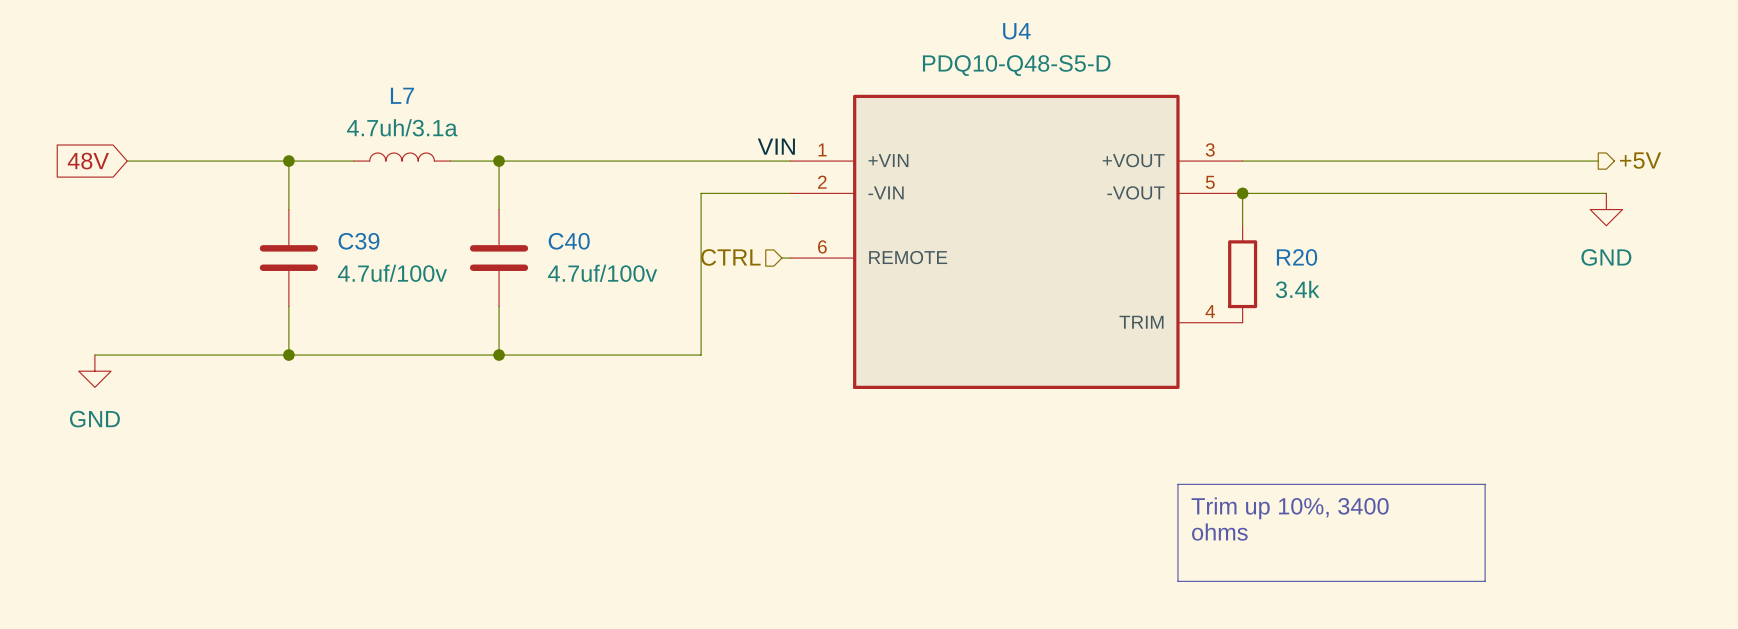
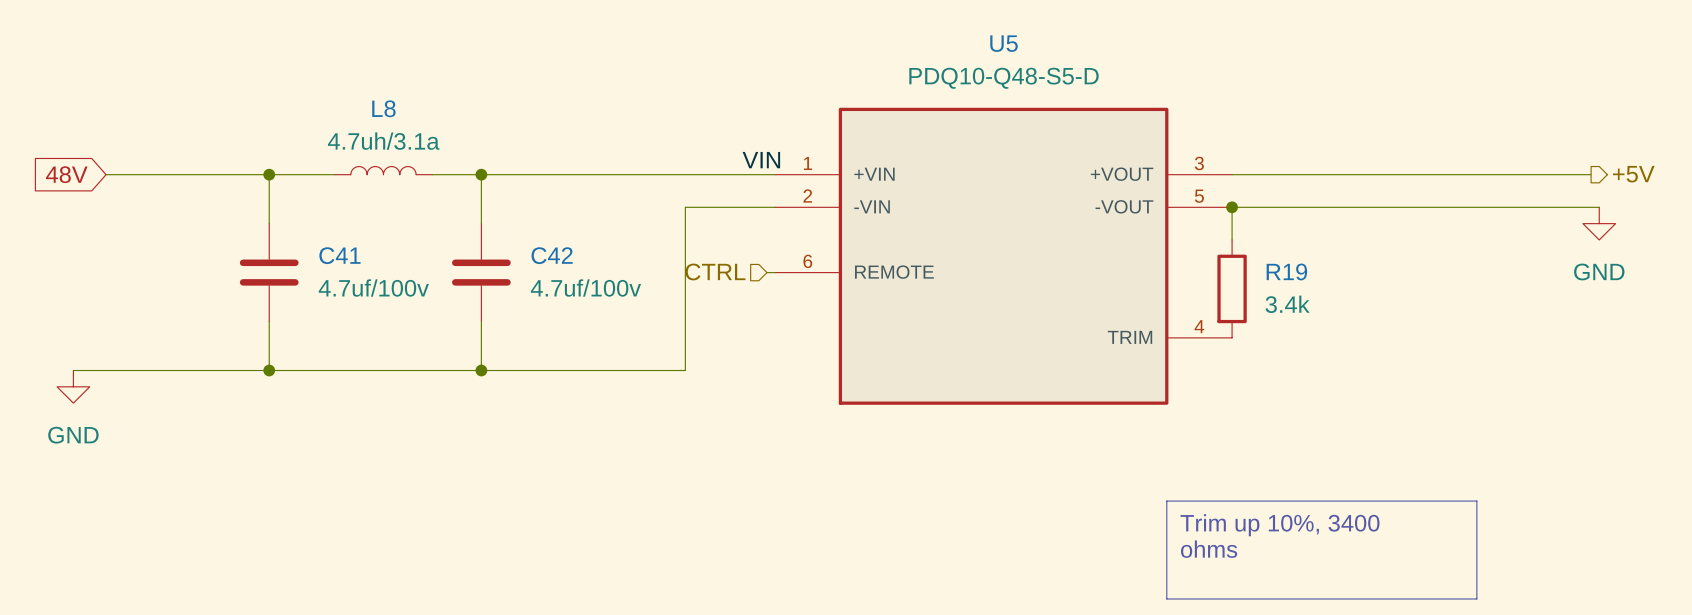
U4 name: U4 (1016, 31) -> U5 (1004, 43)
L7 name: L7 (402, 95) -> L8 (383, 108)
C39 name: C39 (358, 241) -> C41 (339, 255)
C40 name: C40 (569, 241) -> C42 (552, 255)
R20 name: R20 (1297, 257) -> R19 (1286, 271)

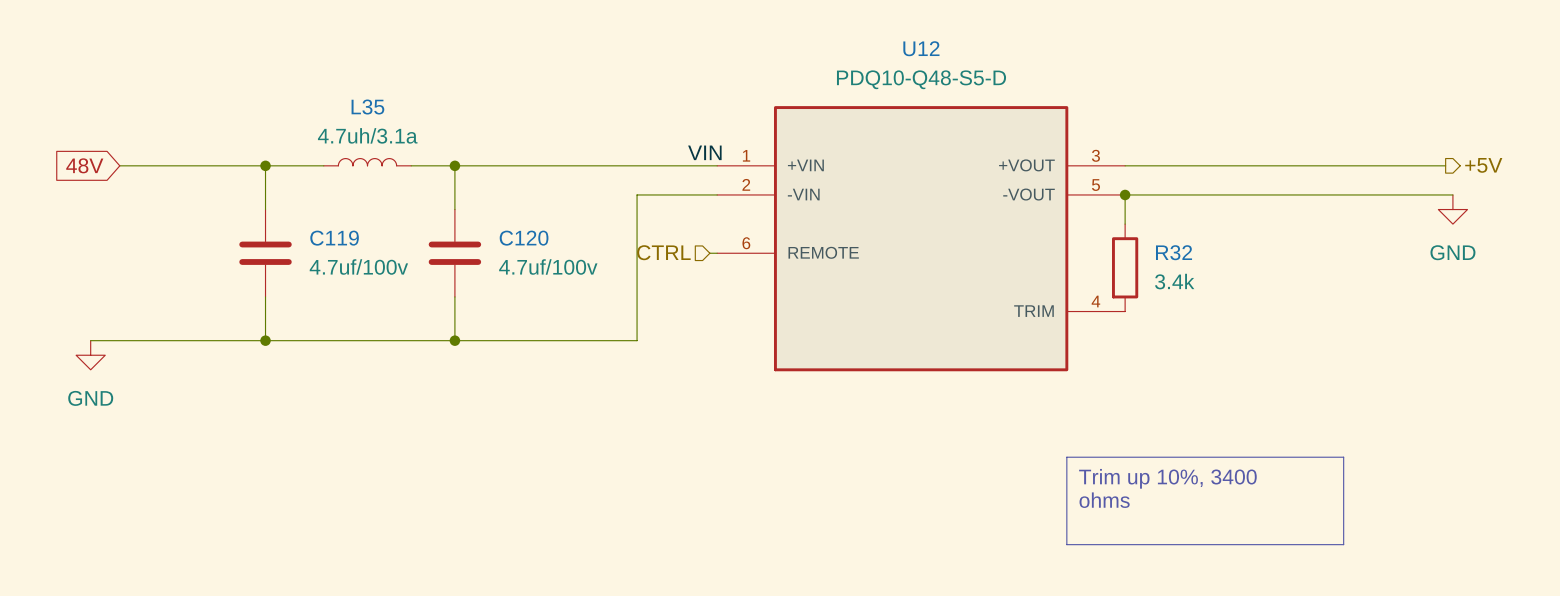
U5 name: U5 (1004, 43) -> U12 (921, 48)
L8 name: L8 (383, 108) -> L35 (367, 107)
C41 name: C41 (339, 255) -> C119 (334, 238)
C42 name: C42 (552, 255) -> C120 (524, 238)
R19 name: R19 (1286, 271) -> R32 (1174, 252)

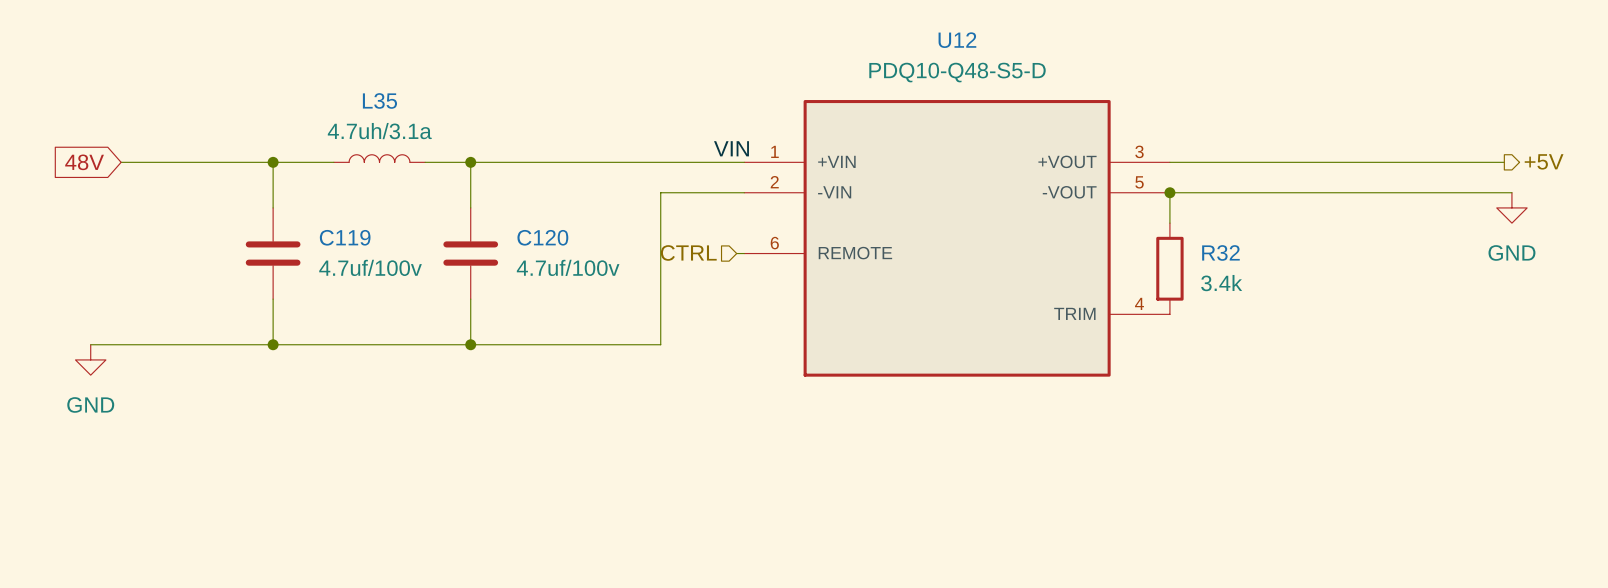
line: (1066, 457) (1343, 457) (1343, 544) (1066, 544) (1066, 457) -> none
text: Trim up 10%, 3400 (1167, 478) -> none
text: ohms (1104, 500) -> none

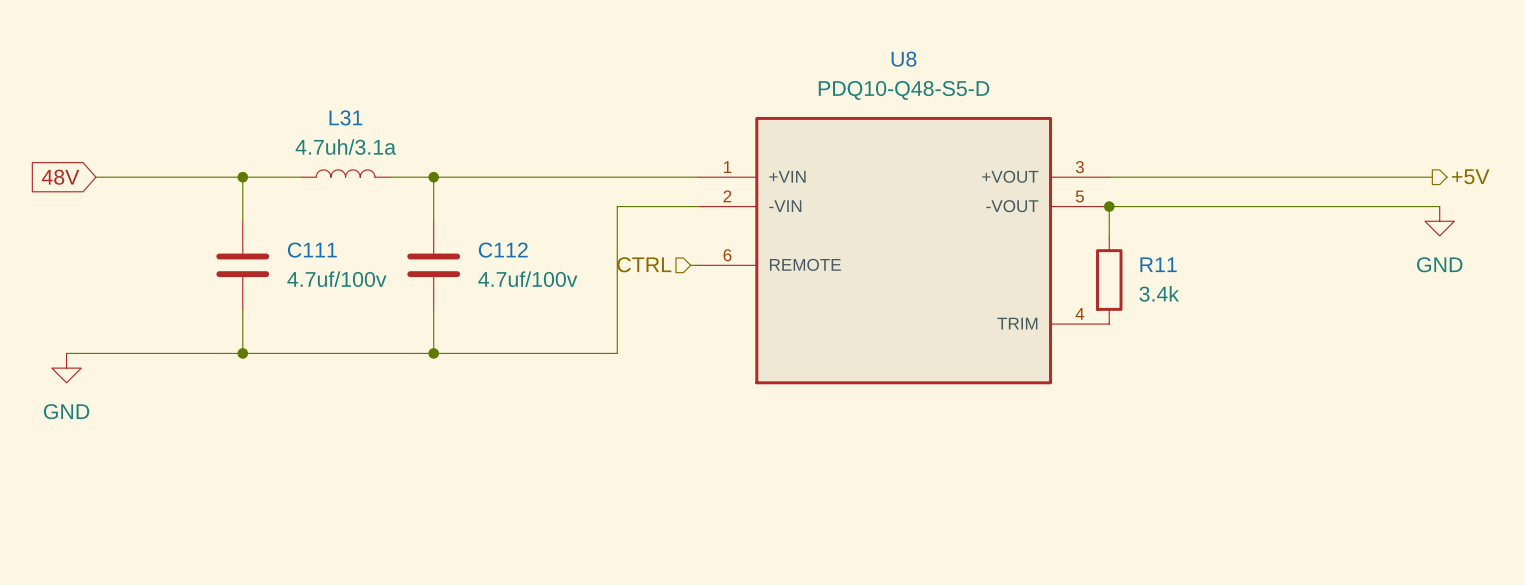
U12 name: U12 (957, 40) -> U8 (904, 59)
L35 name: L35 (379, 100) -> L31 (345, 117)
label: VIN (731, 148) -> none
C119 name: C119 (345, 237) -> C111 (312, 250)
C120 name: C120 (542, 237) -> C112 (503, 250)
R32 name: R32 (1220, 252) -> R11 (1158, 264)

